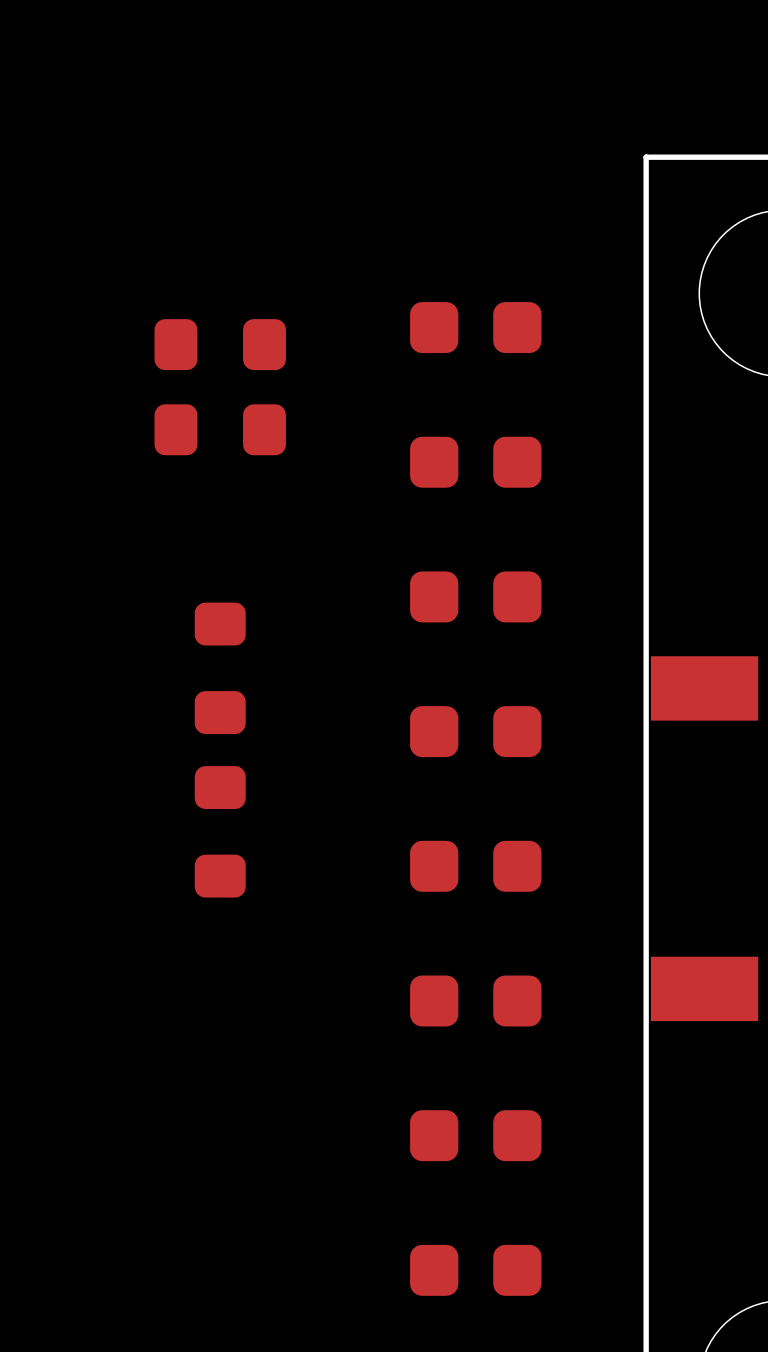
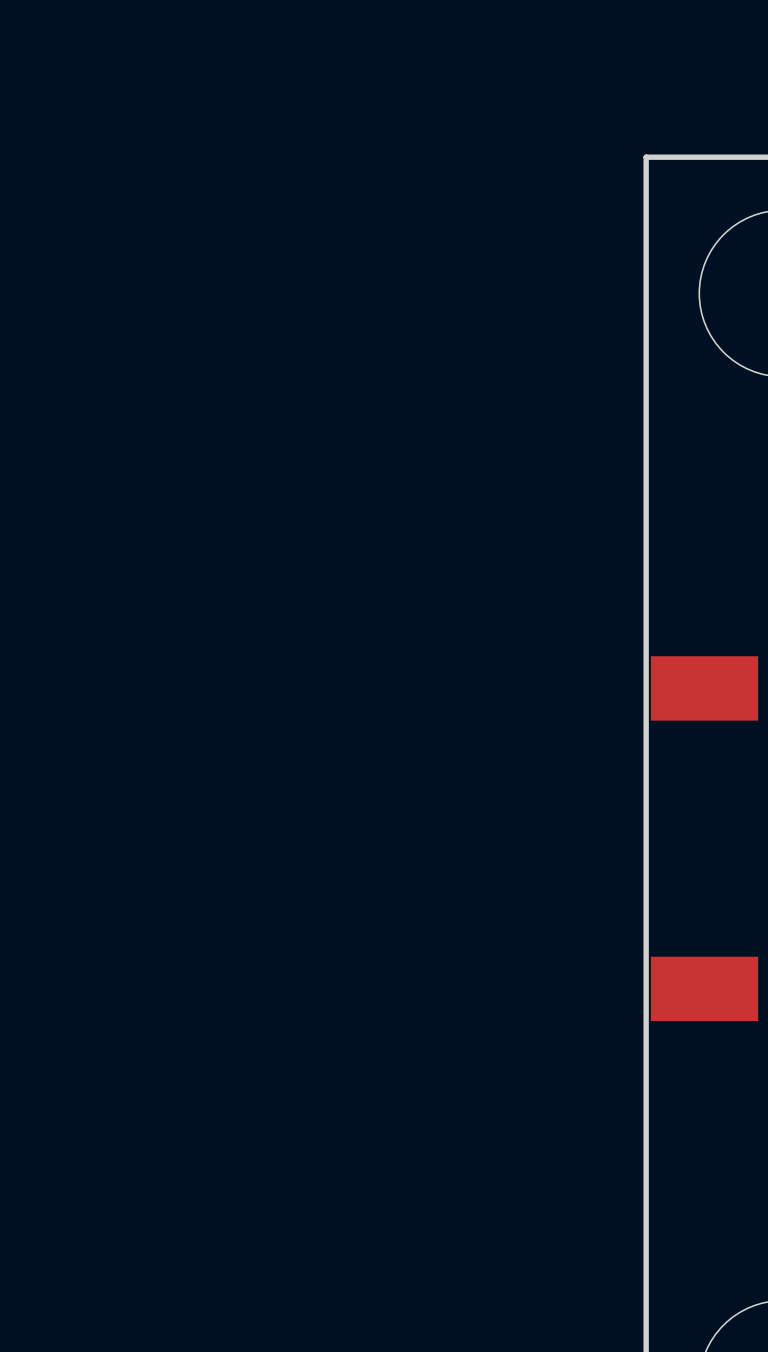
part: (475, 327) -> none
part: (220, 344) -> none
part: (220, 429) -> none
part: (475, 462) -> none
part: (475, 596) -> none
part: (220, 668) -> none
part: (475, 731) -> none
part: (220, 831) -> none
part: (475, 866) -> none
part: (475, 1000) -> none
part: (475, 1135) -> none
part: (475, 1270) -> none

